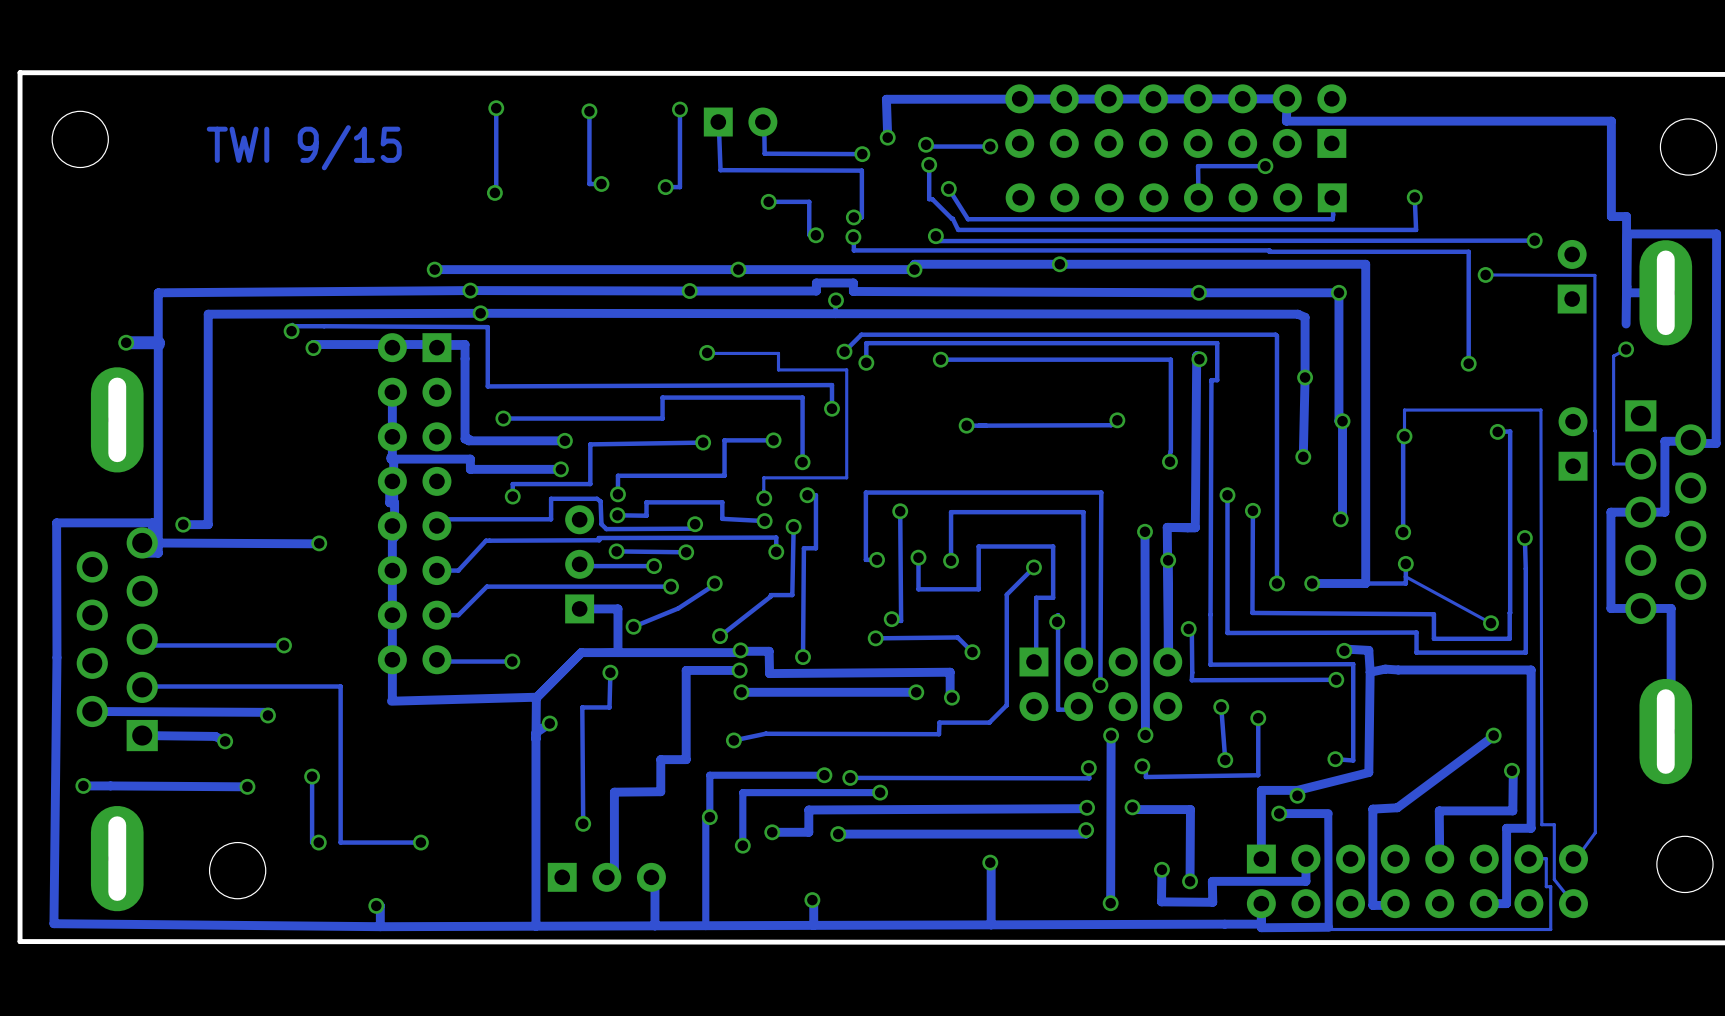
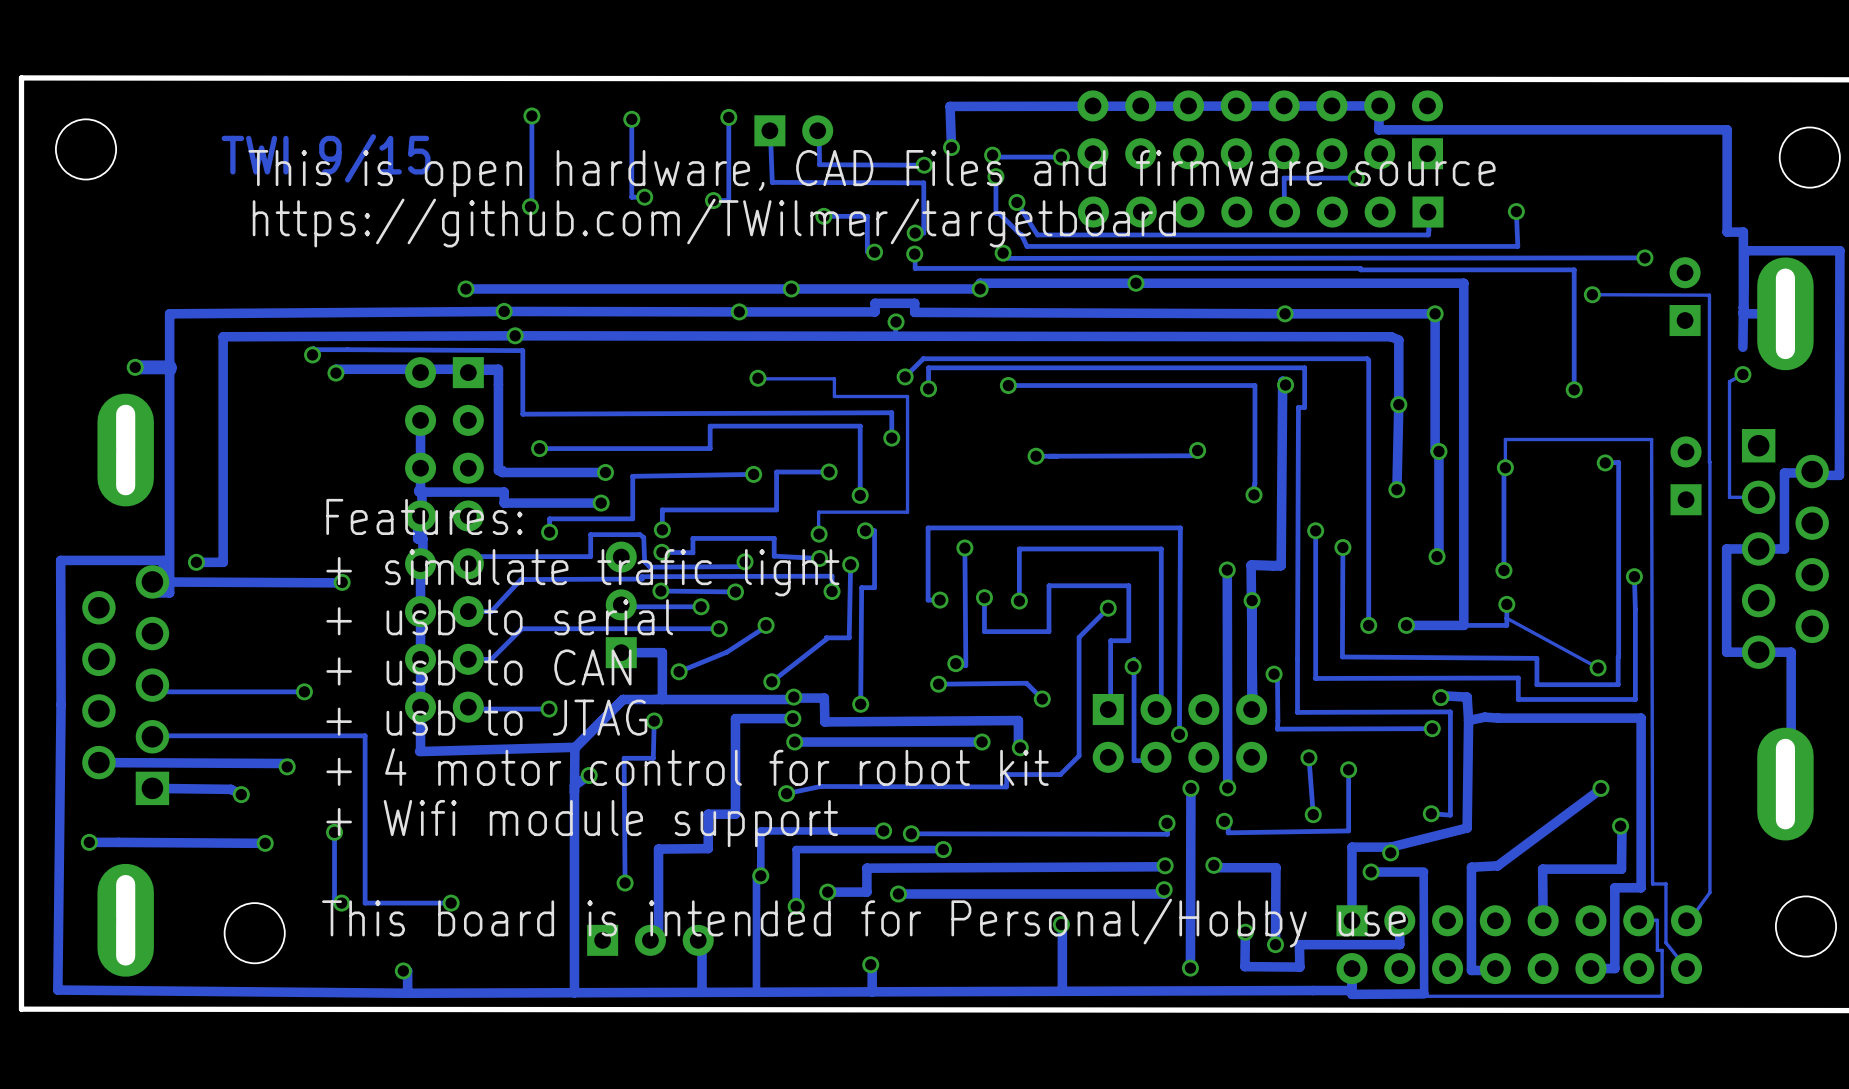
text: none -> This is open hardware, CAD Files and firmware source (872, 173)
text: none -> https://github.com/TWilmer/targetboard (714, 223)
text: none -> Features: (424, 516)
text: none -> + simulate trafic light (582, 572)
text: none -> + usb to serial (499, 617)
text: none -> + usb to CAN (478, 667)
text: none -> + usb to JTAG (486, 717)
text: none -> + 4 motor control for robot kit (687, 767)
text: none -> + Wifi module support (582, 823)
text: none -> This board is intended for Personal/Hobby use (863, 923)

